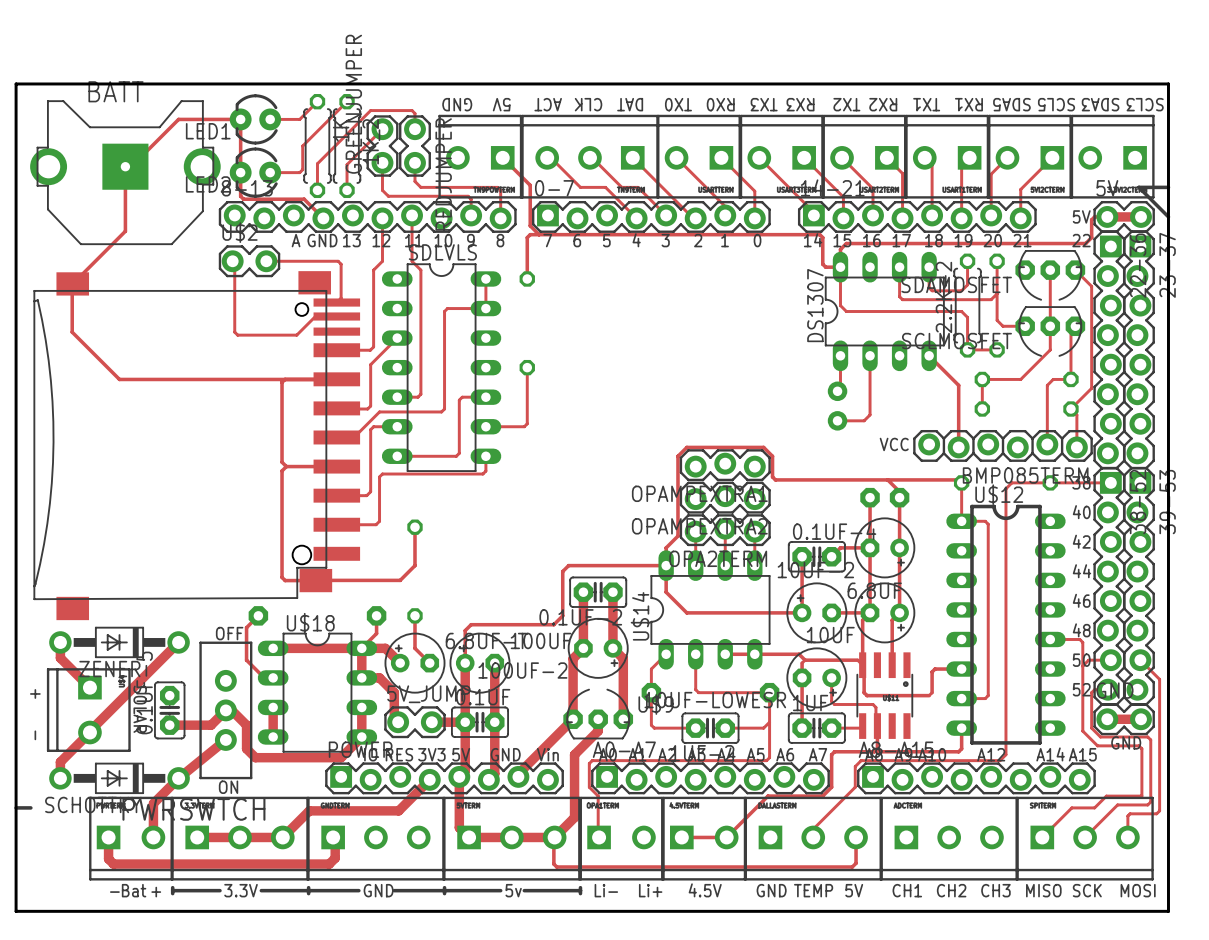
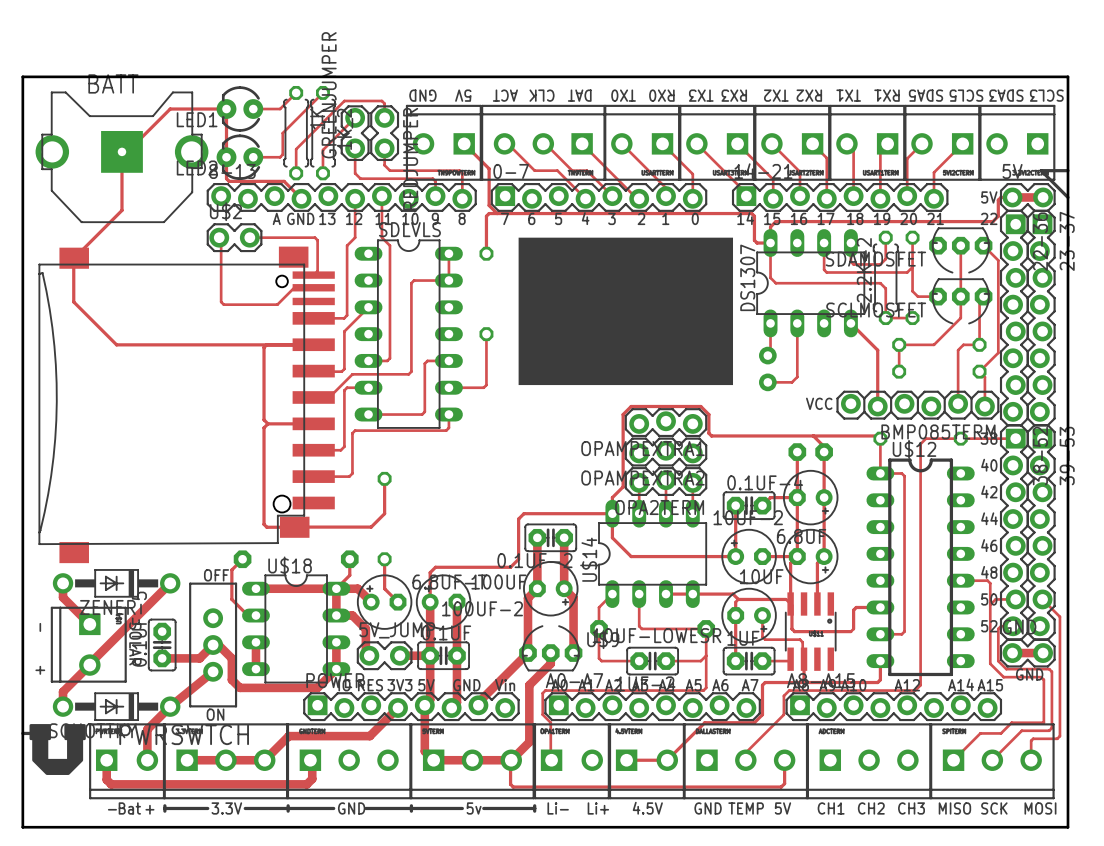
drawing: none -> [518, 237, 734, 386]
text position: + (35, 693) -> + (40, 670)
text position: - (35, 735) -> - (40, 627)
drawing: none -> [29, 724, 86, 775]

